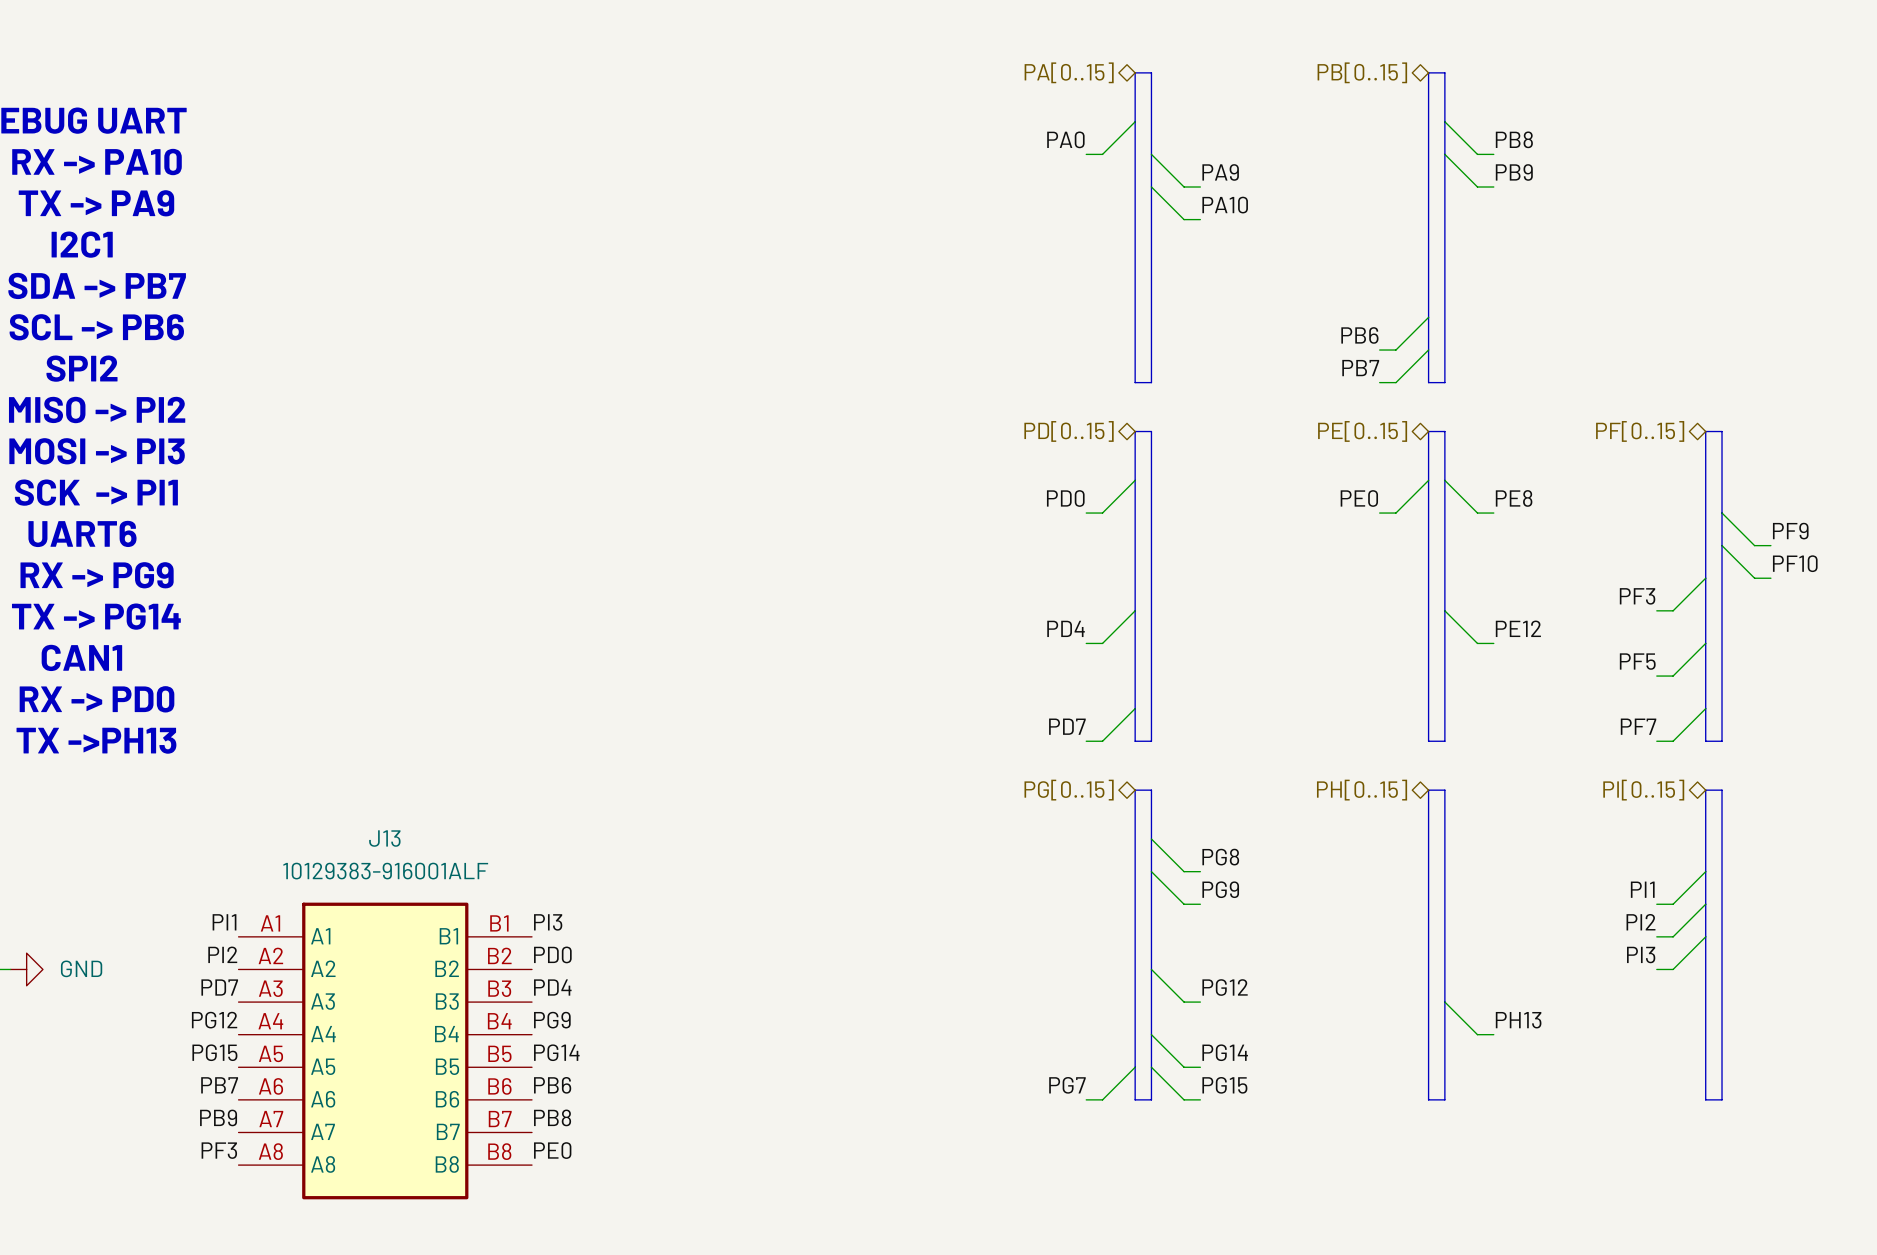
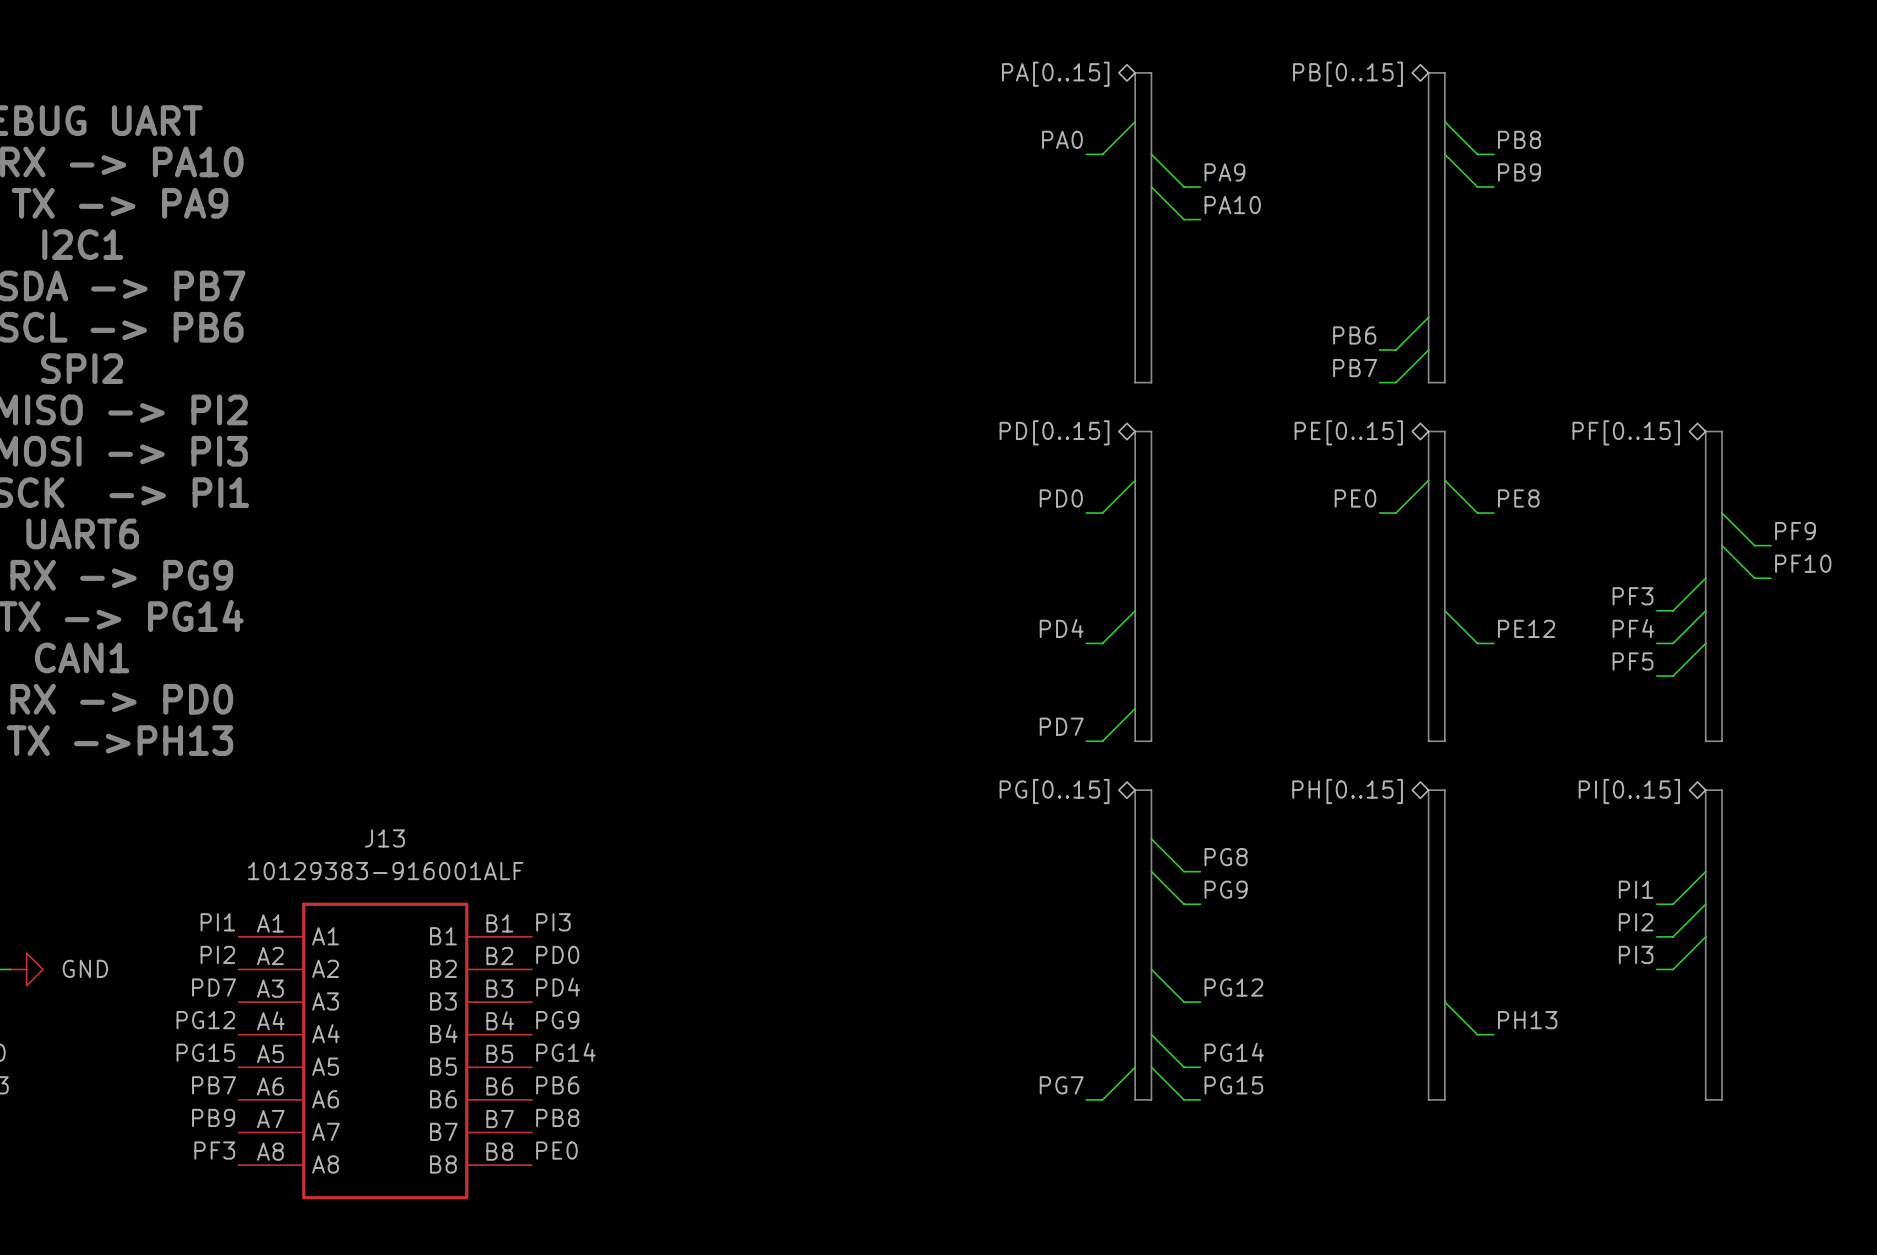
label: none -> PF4 (1633, 628)
wire: (1705, 708) (1673, 741) (1656, 741) -> (1705, 610) (1673, 643) (1656, 643)
label: PF7 (1638, 726) -> none

